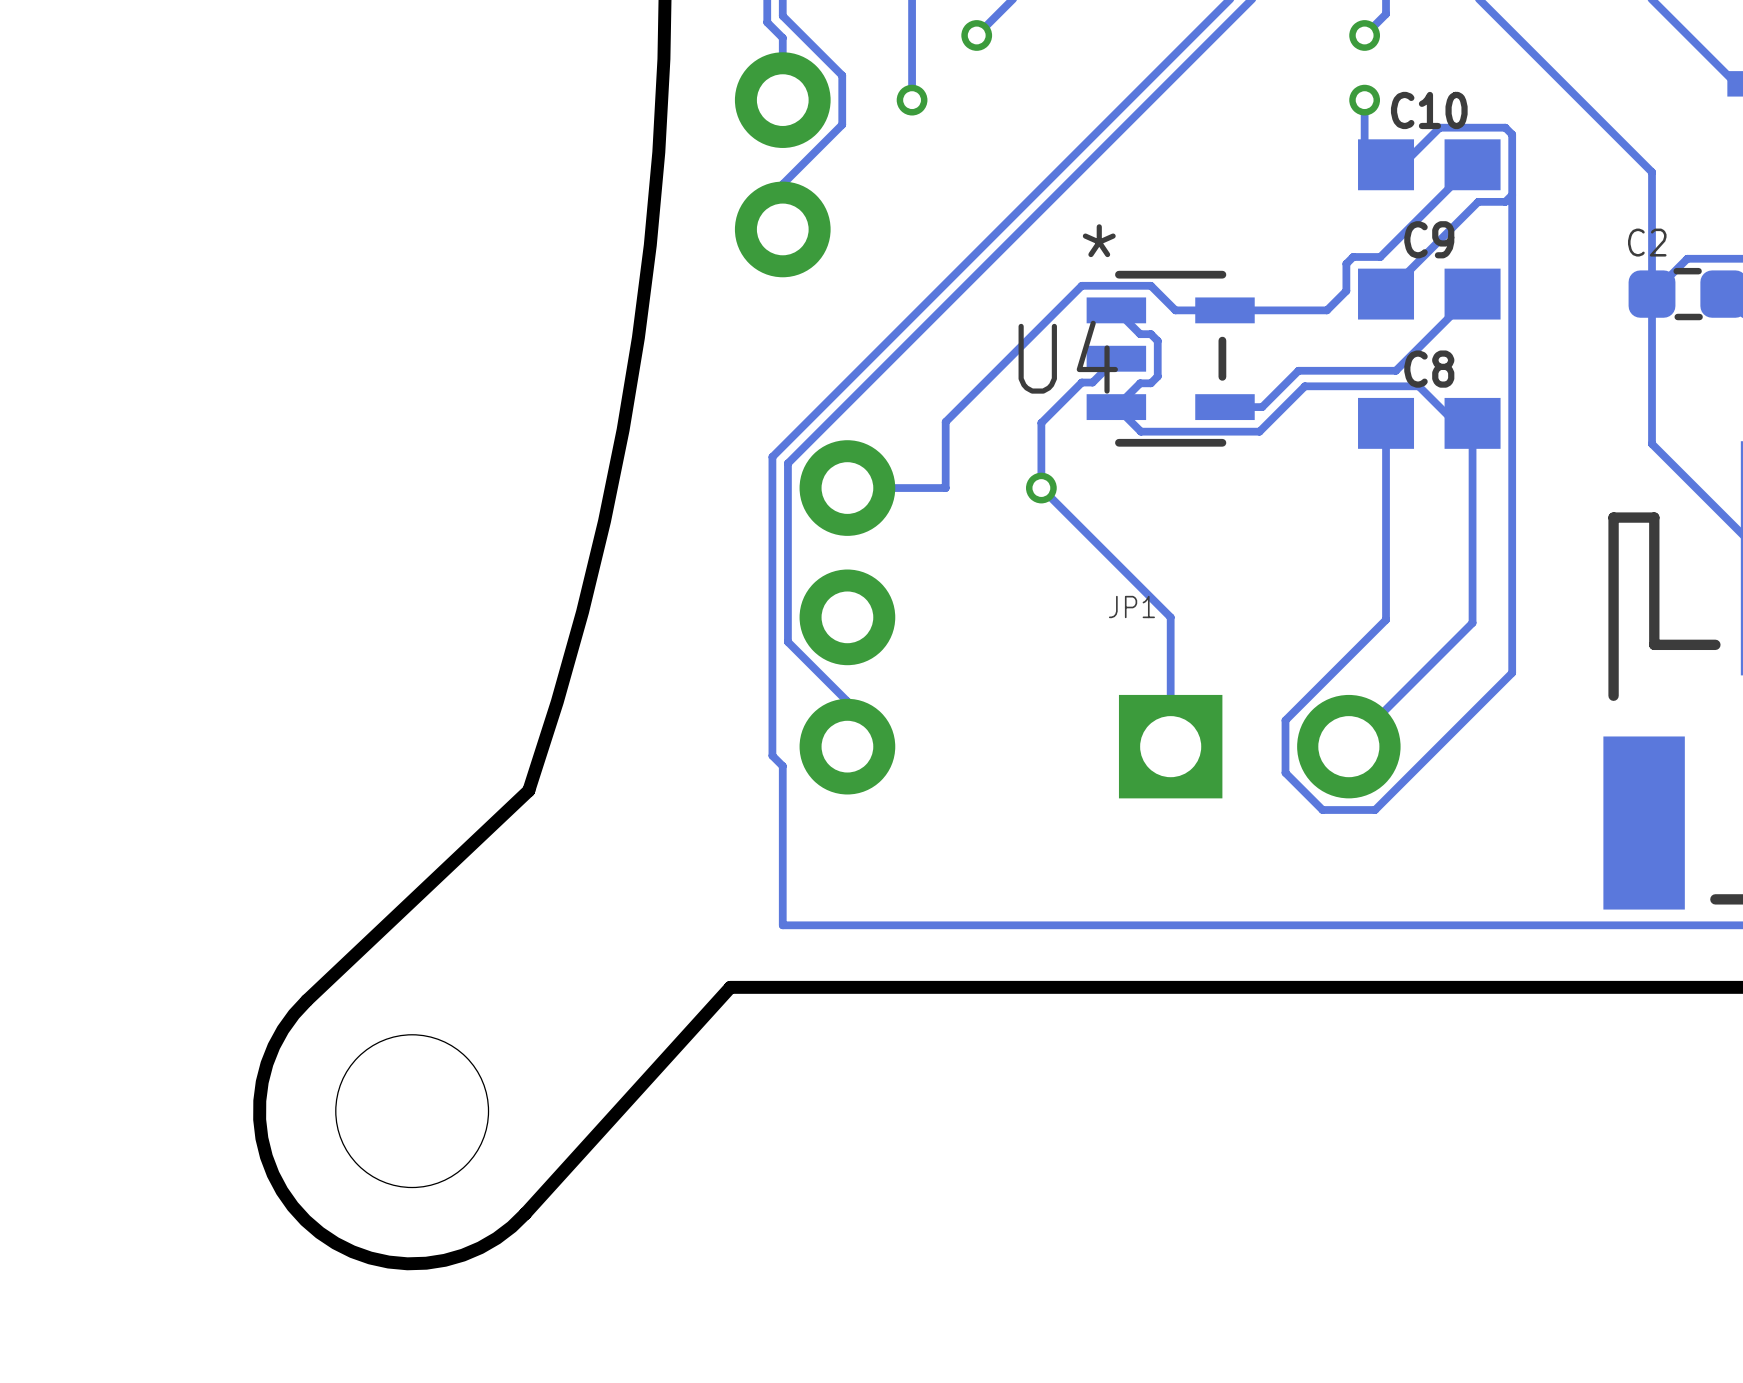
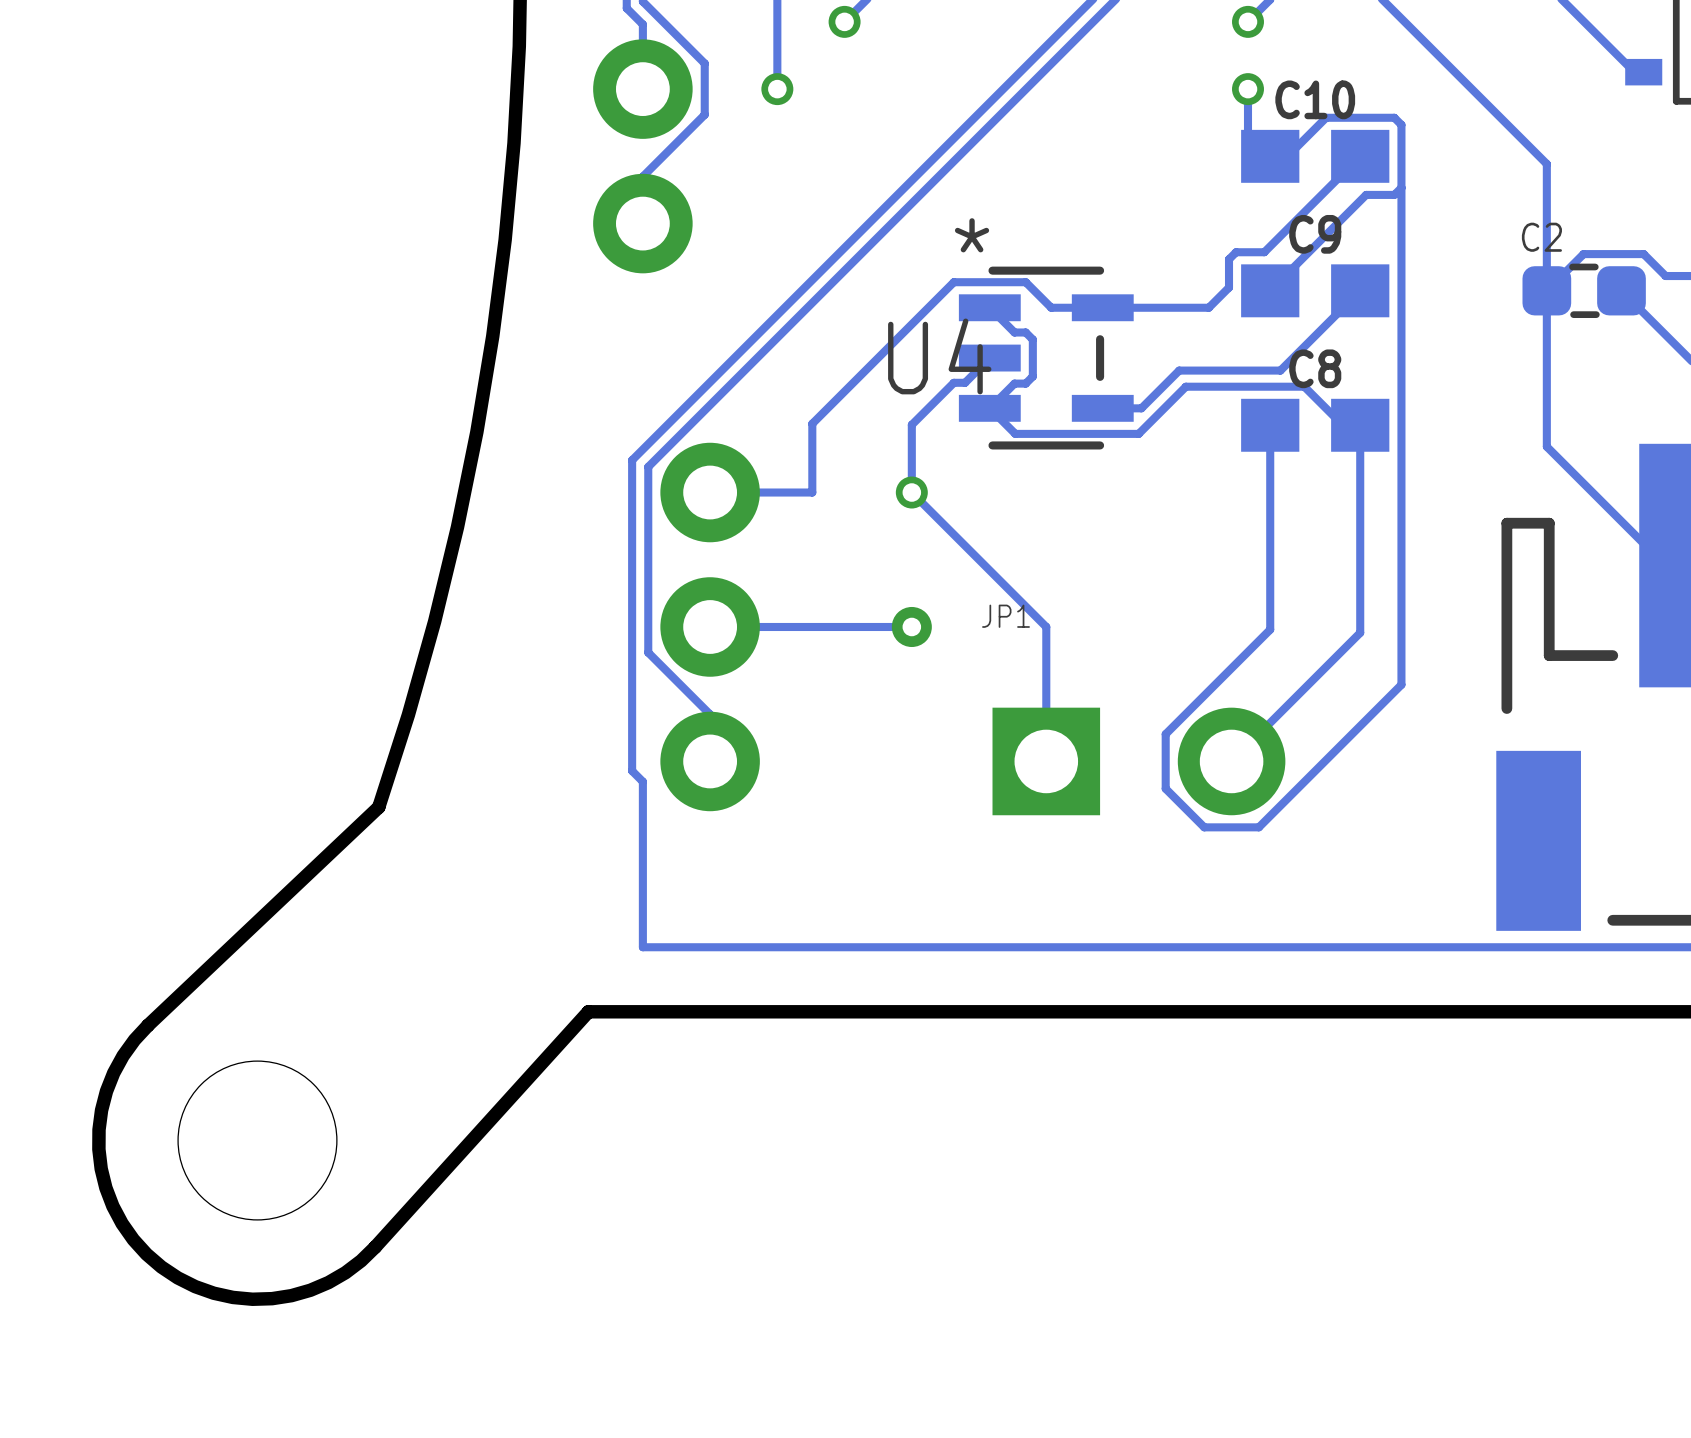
track: none -> (911, 626) (710, 626)
via: none -> (911, 626)

